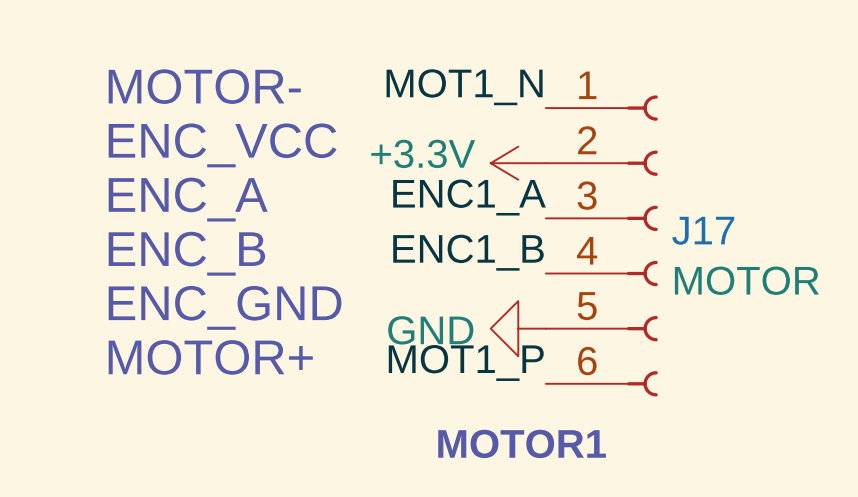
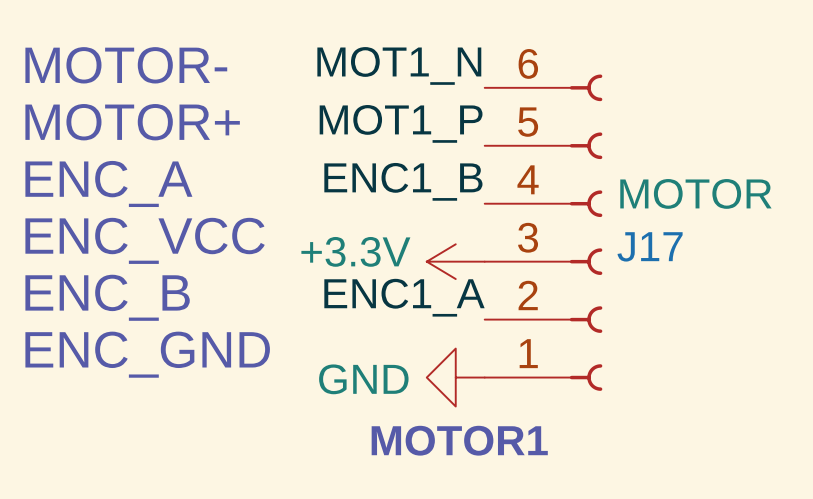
text: ENC_VCC (222, 145) -> MOTOR+ (132, 122)
power symbol position: +3.3V (518, 163) -> +3.3V (455, 261)
label: ENC1_A (469, 197) -> ENC1_B (403, 181)
J17 flip: as is (642, 245) -> up-down (586, 232)
label: ENC1_B (468, 252) -> ENC1_A (404, 297)
text: ENC_B (186, 253) -> ENC_VCC (145, 240)
text: ENC_GND (225, 307) -> ENC_B (107, 297)
power symbol position: GND (518, 328) -> GND (455, 377)
text: MOTOR+ (210, 357) -> ENC_GND (147, 354)
label position: MOT1_P (466, 362) -> MOT1_P (401, 123)

